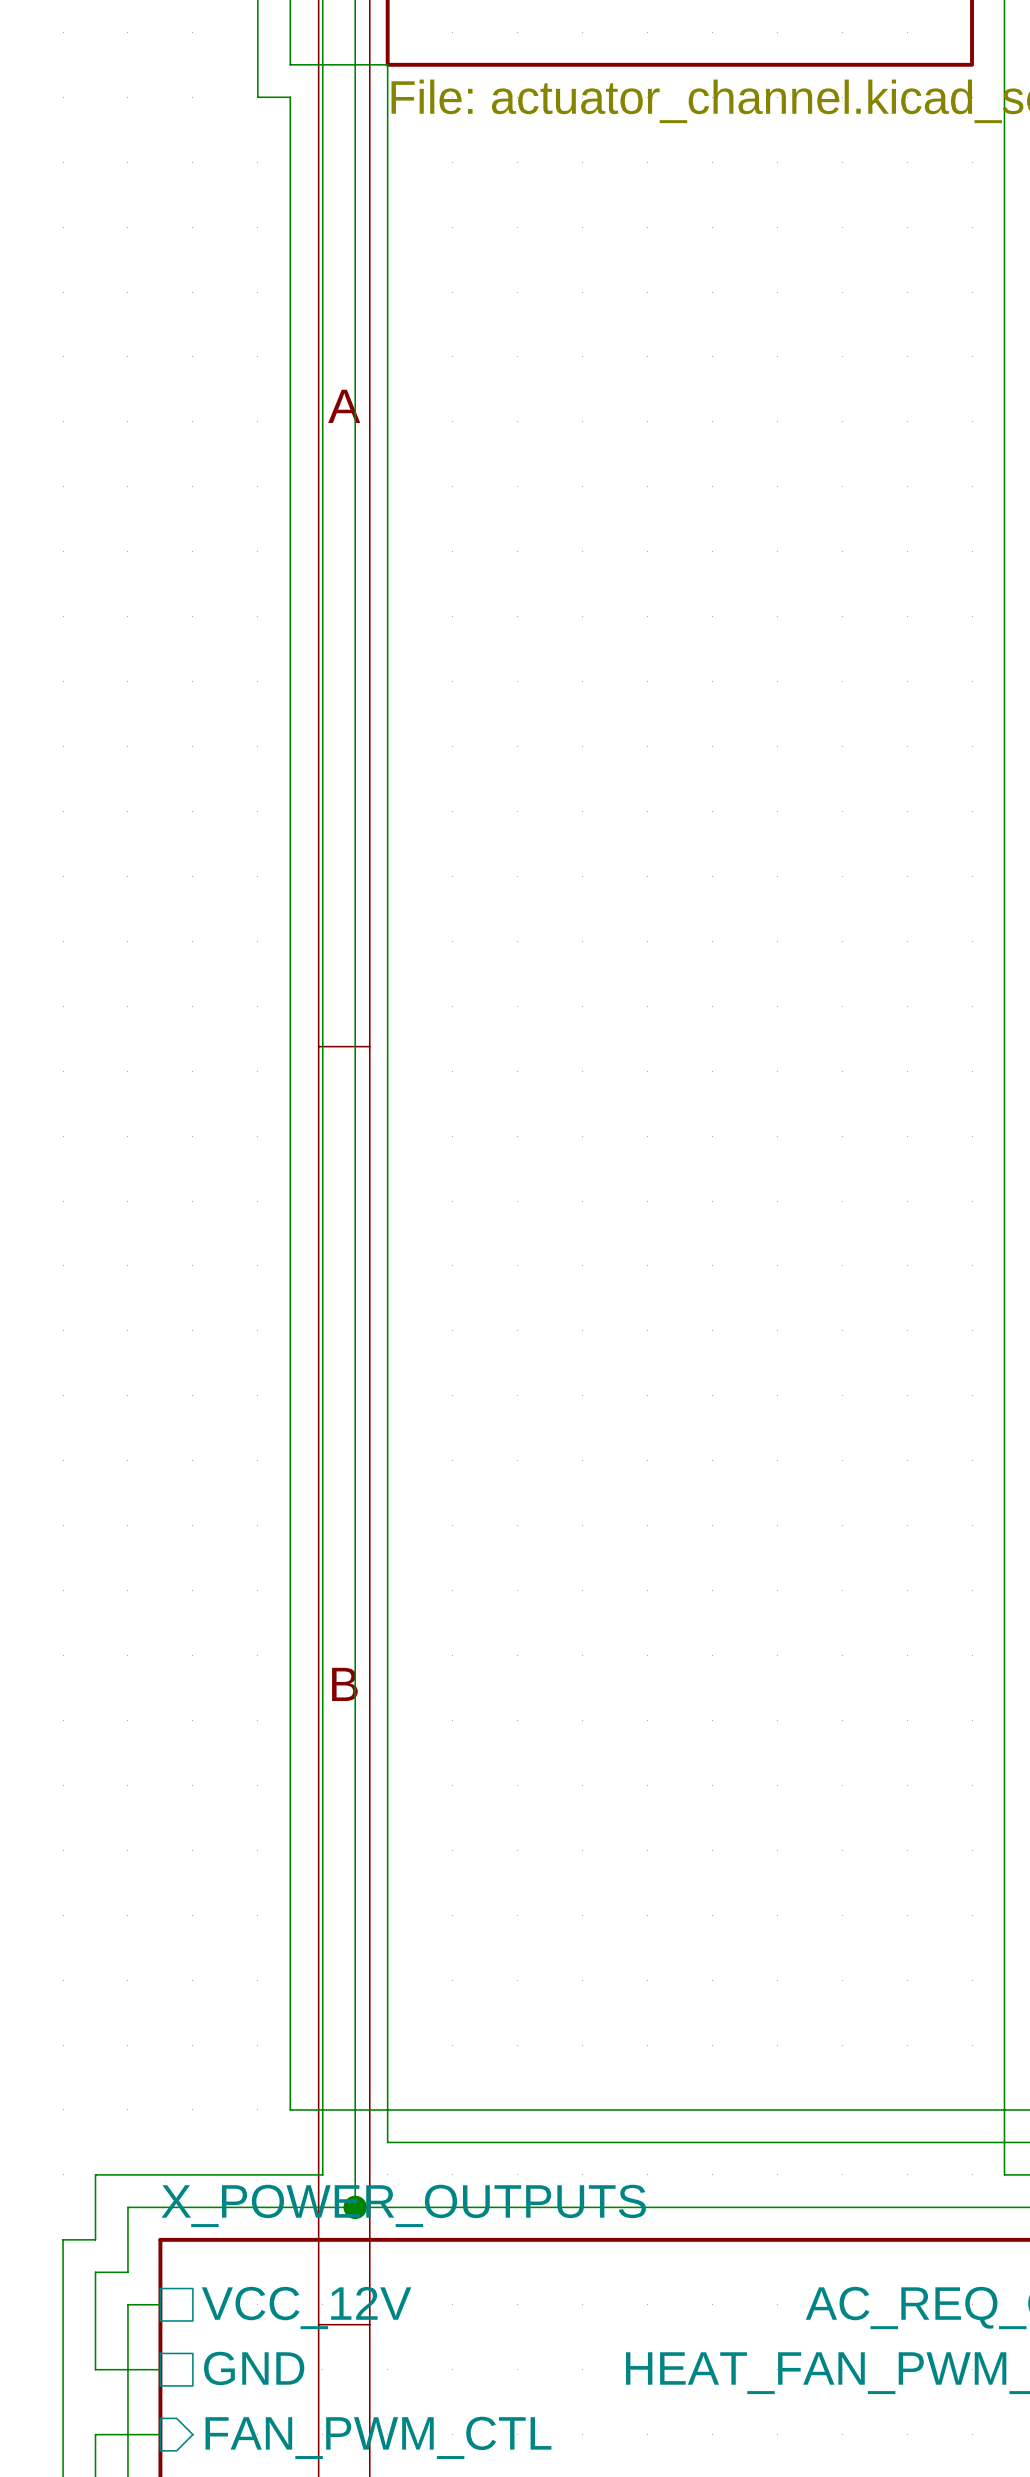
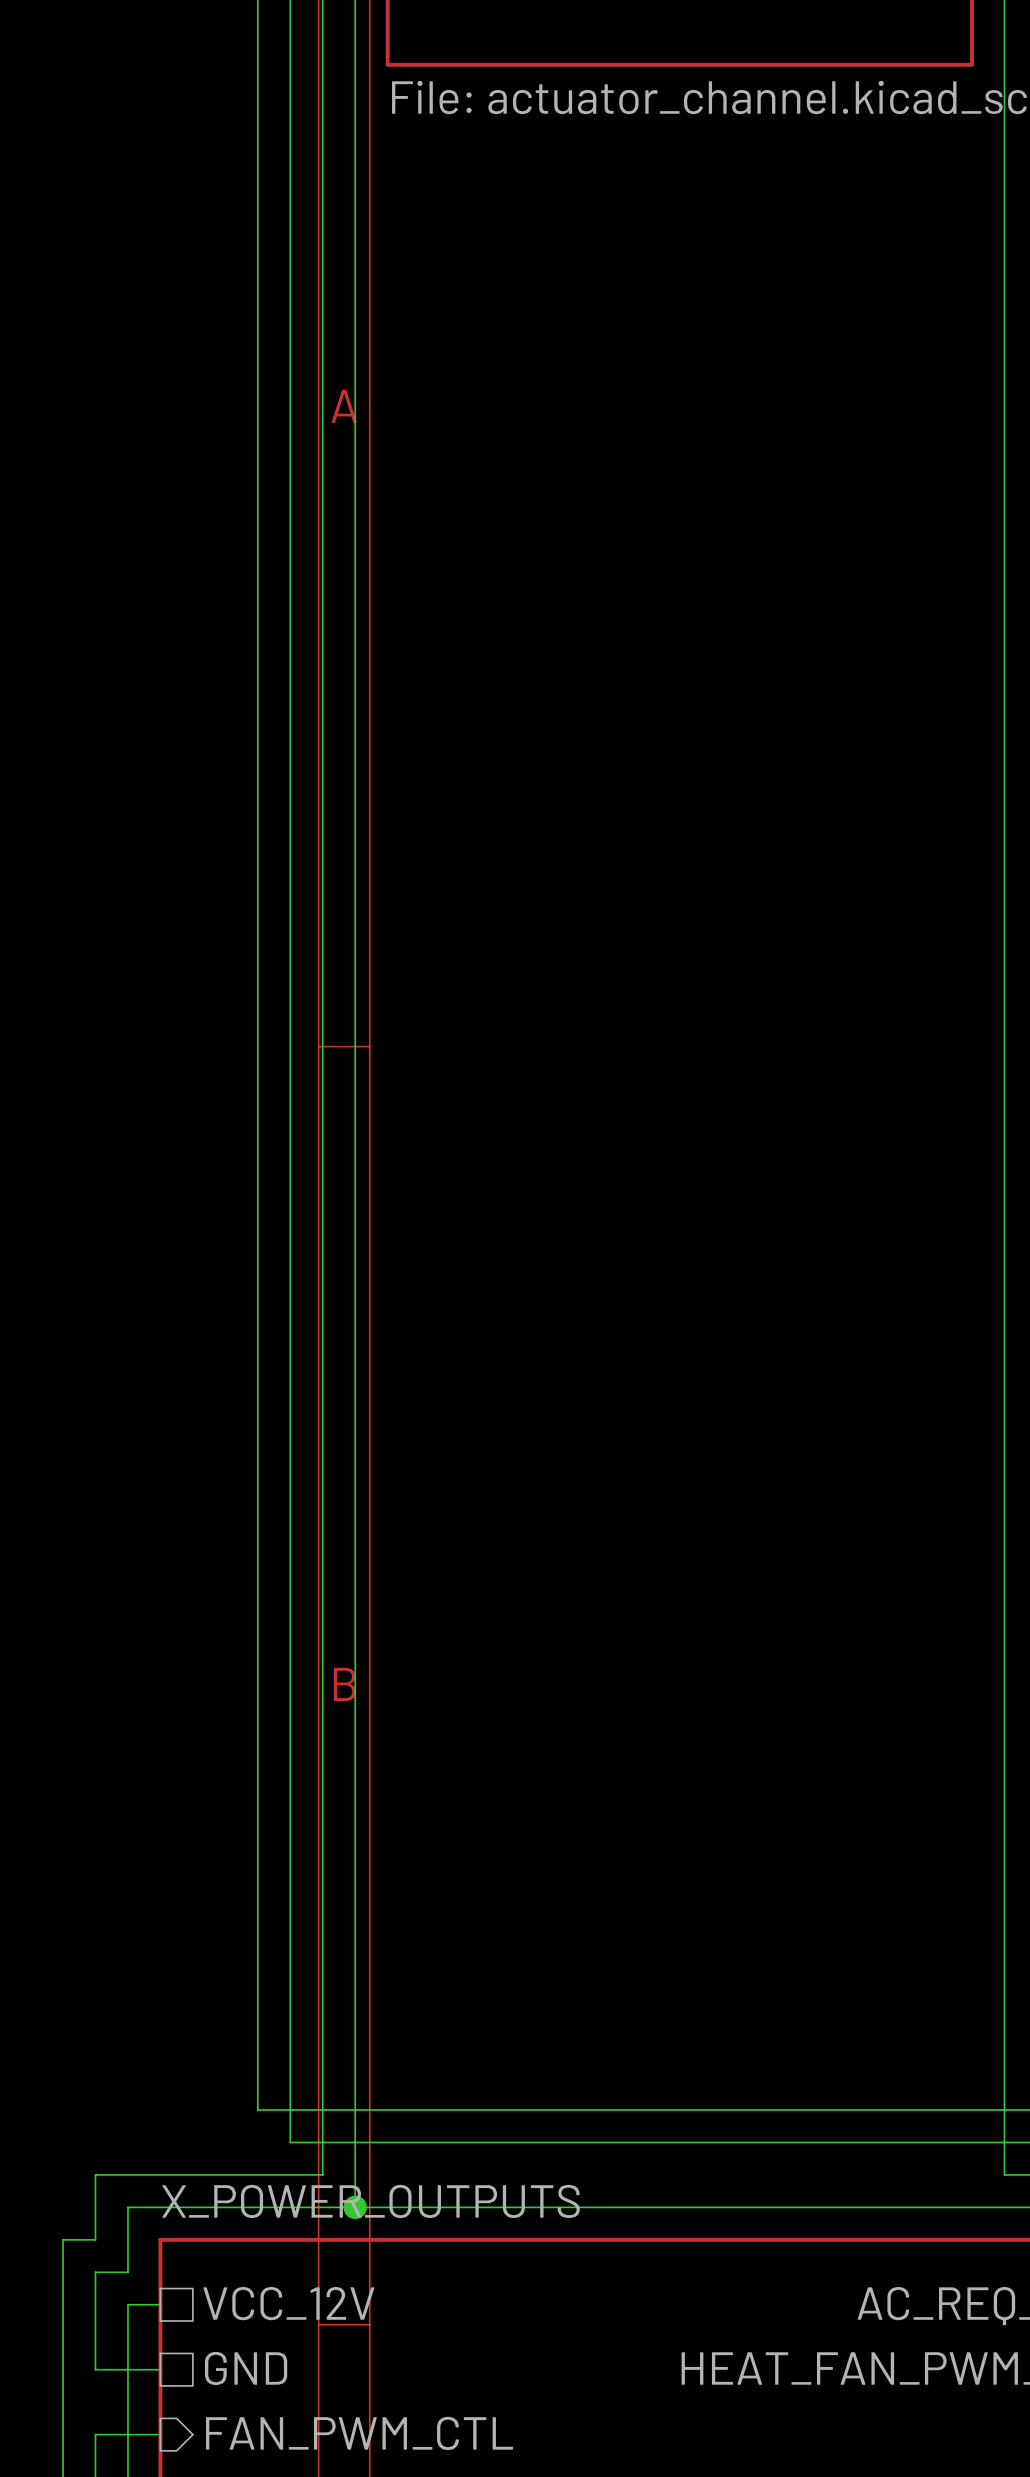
wire: (290, 64) (387, 64) (387, 2142) -> (257, 97) (257, 2109) (290, 2109) (290, 2142) (387, 2142)
wire: (257, 97) (290, 97) -> (290, 64) (290, 97)

